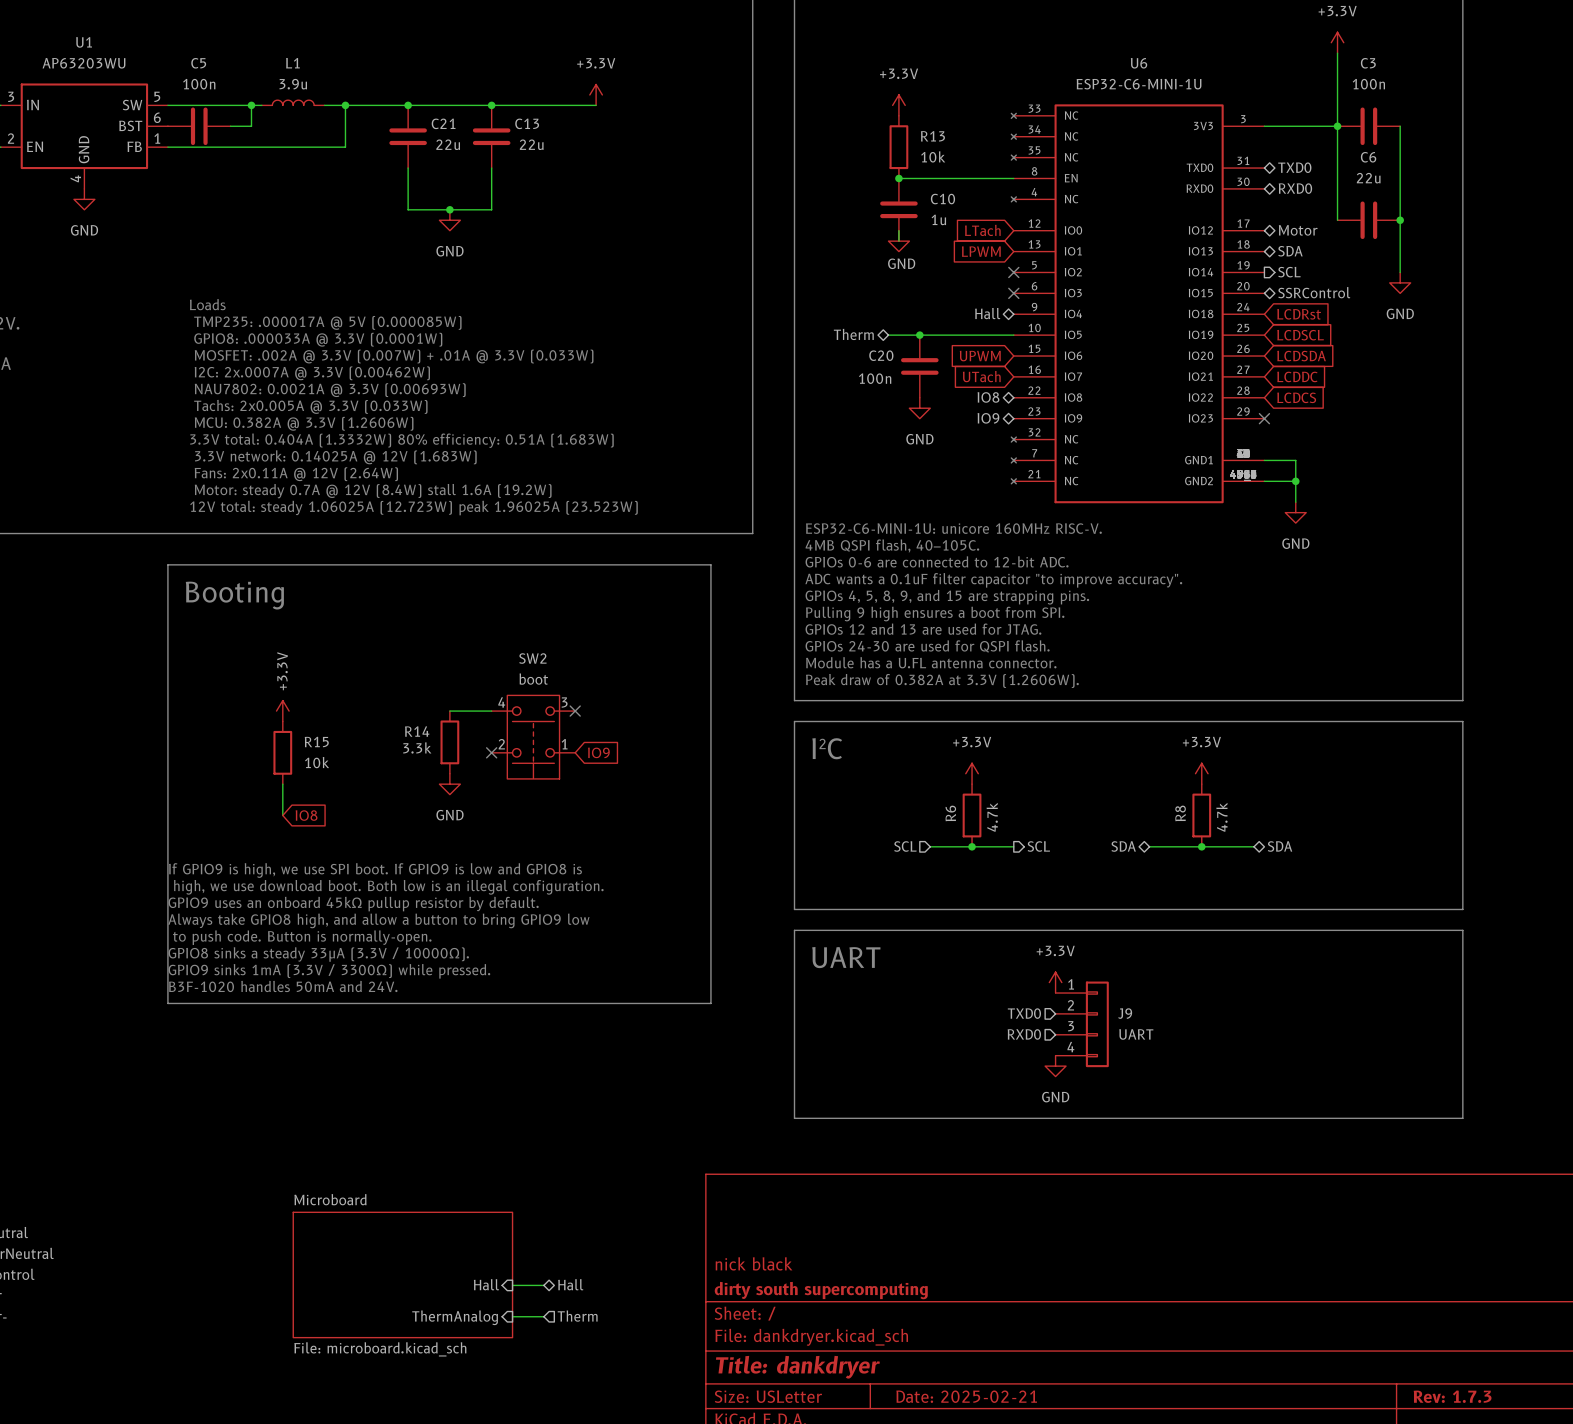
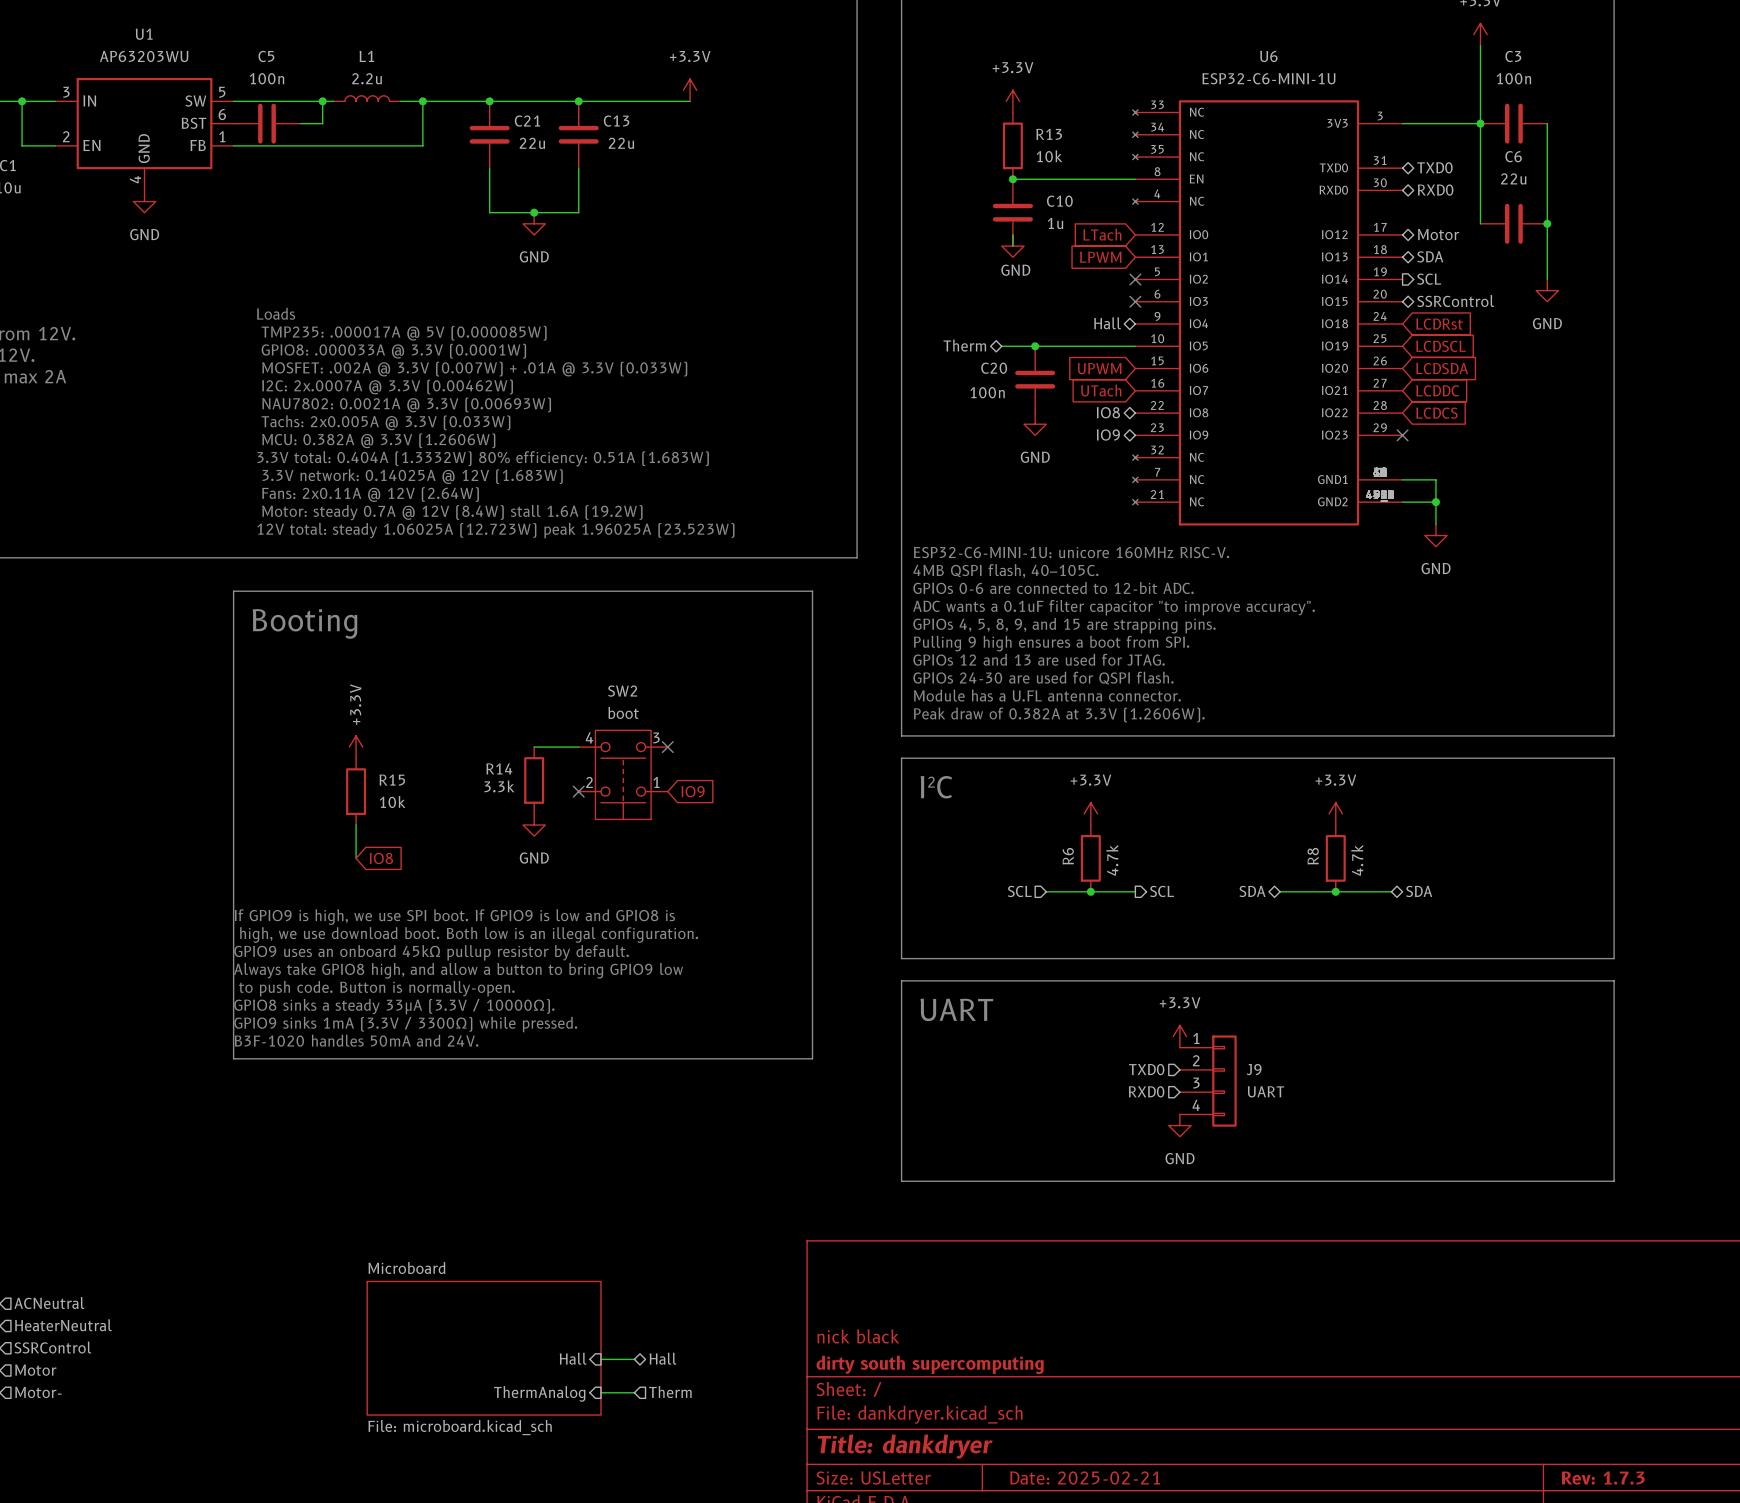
L1 value: 3.9u (293, 84) -> 2.2u (367, 78)

